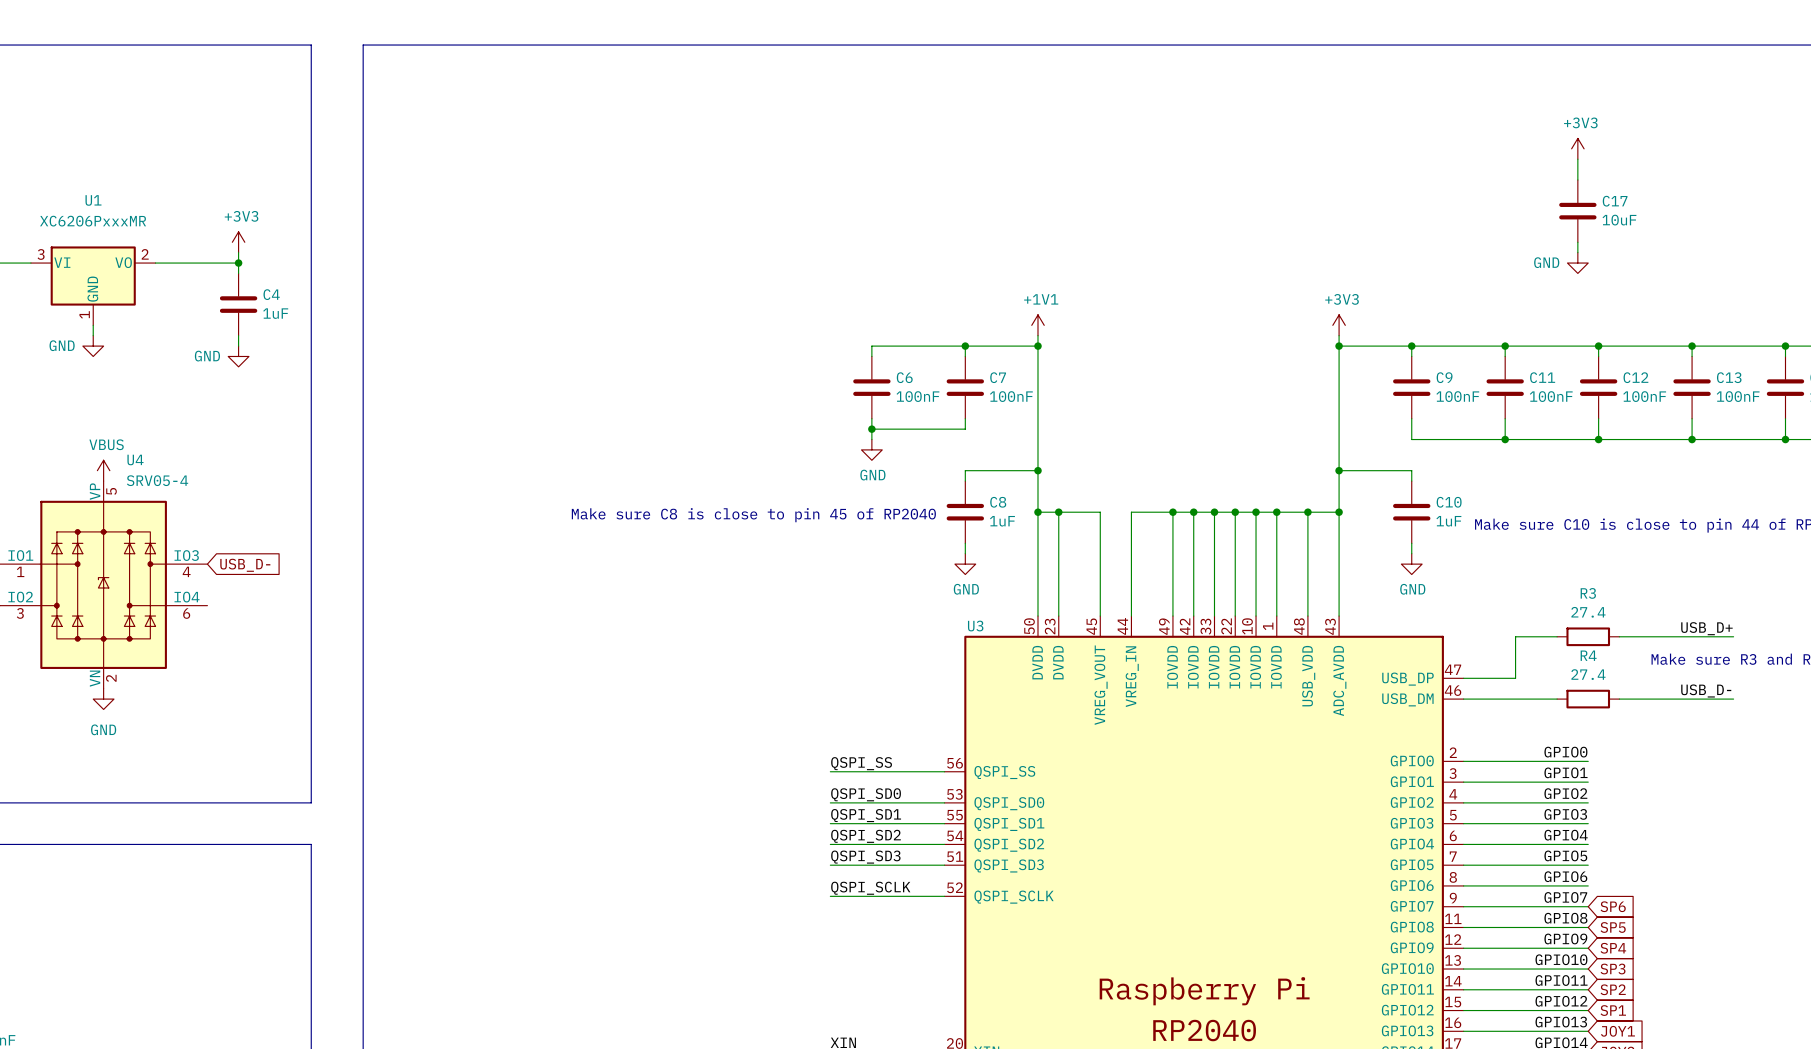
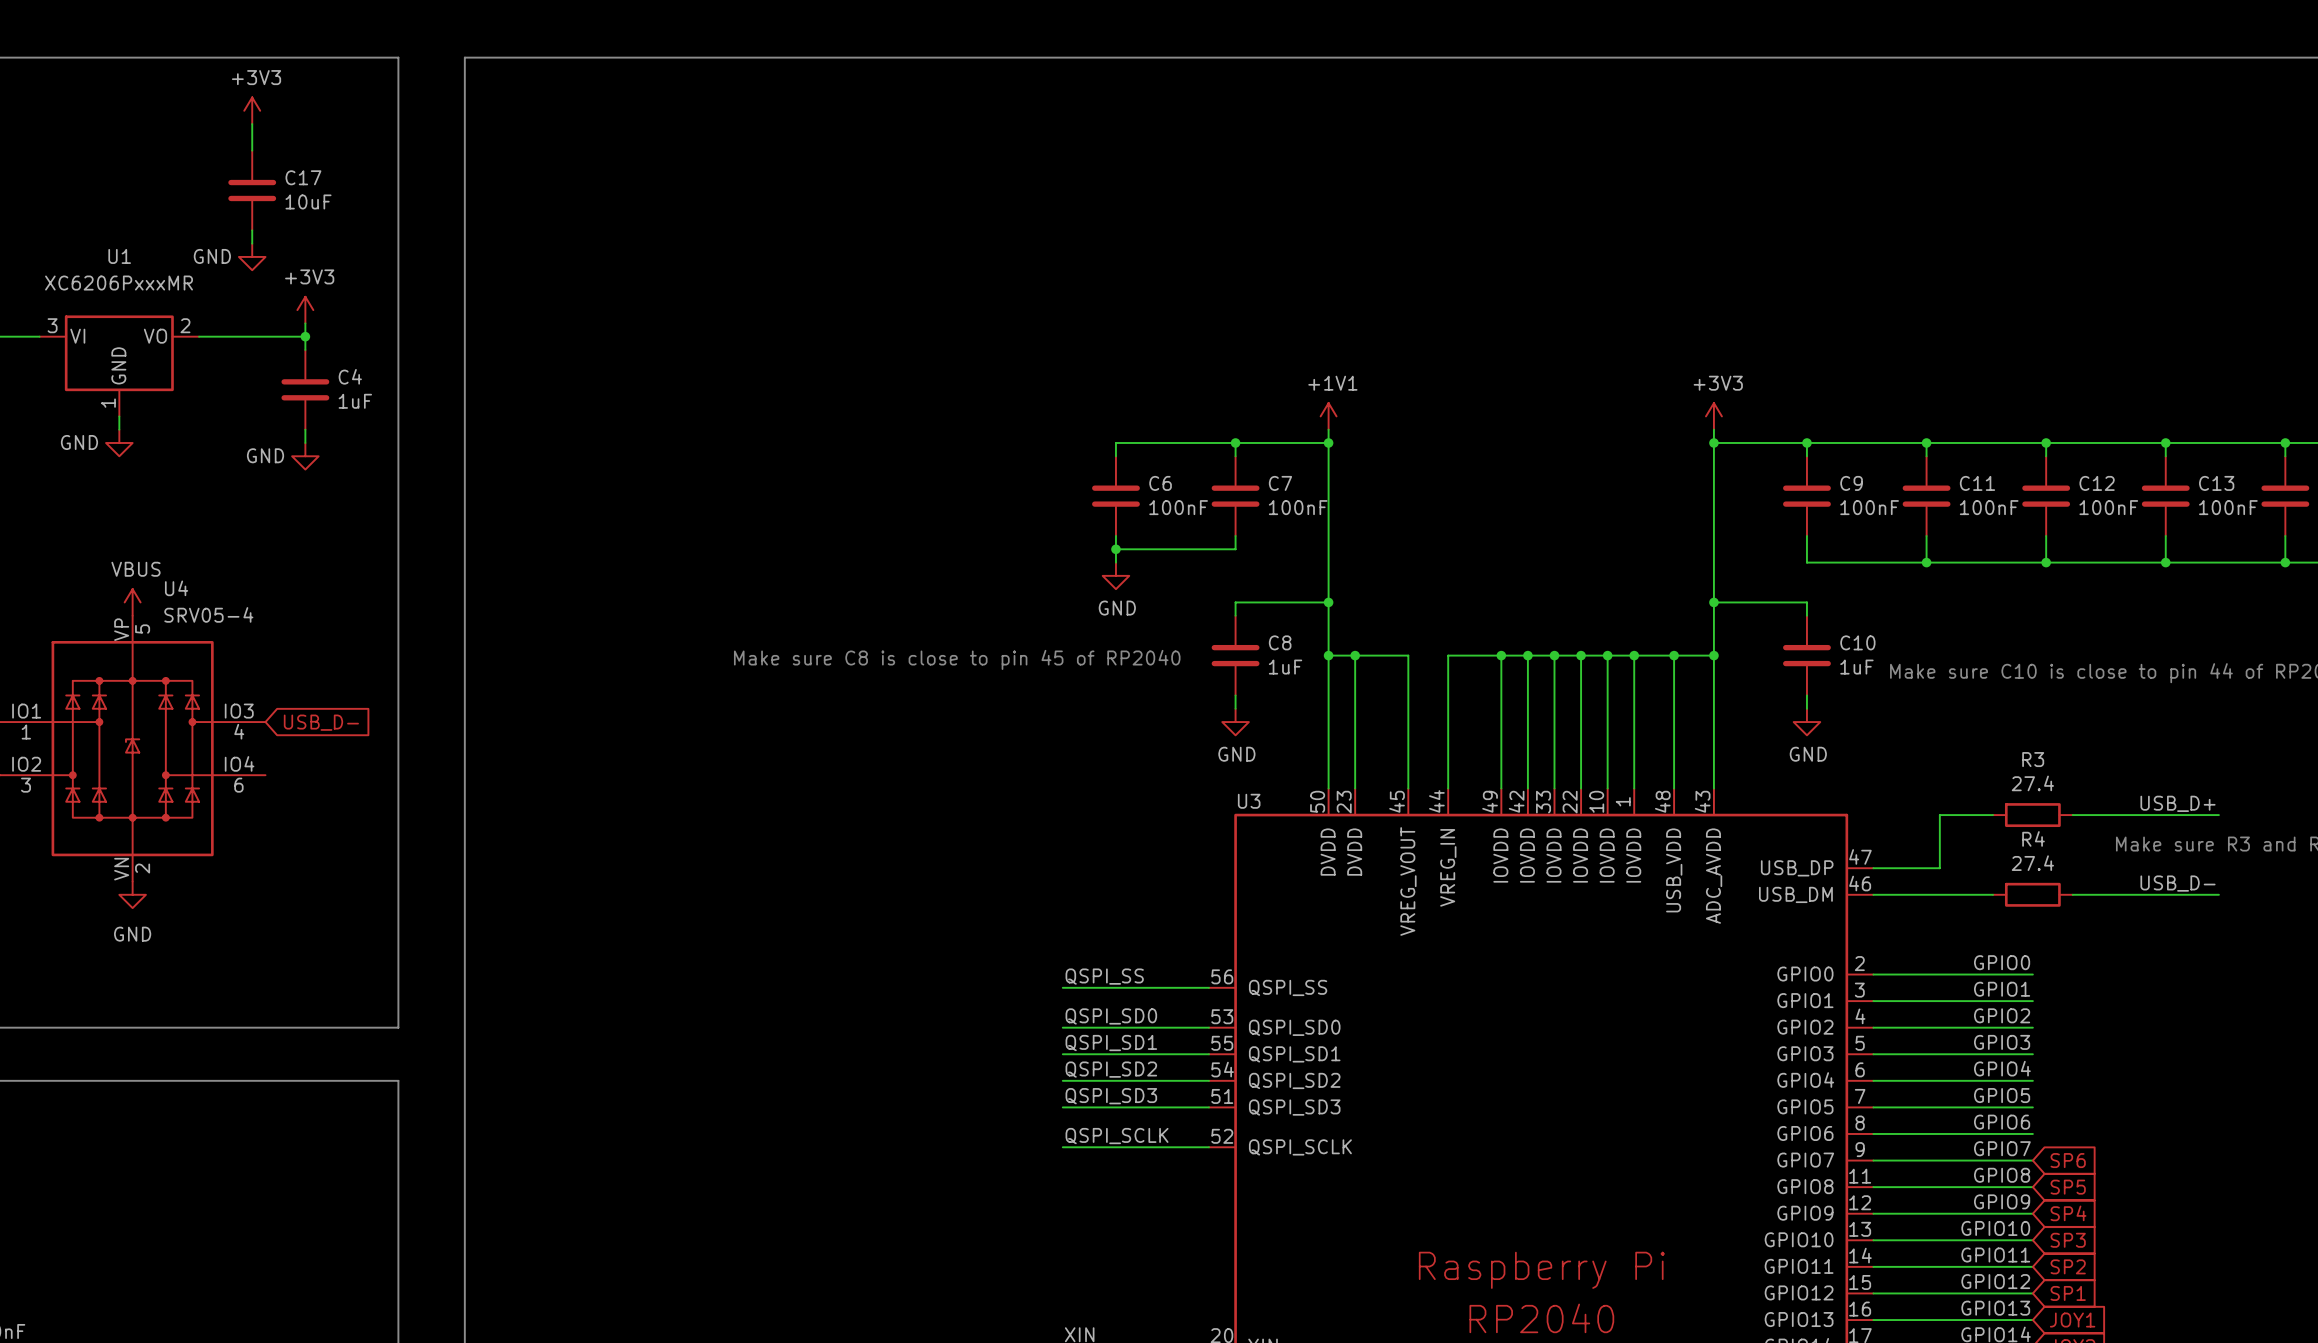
power symbol: none -> +3V3 (252, 110)
wire: none -> (252, 124) (252, 150)
power symbol: +3V3 (1577, 148) -> none
wire: (1577, 159) (1577, 179) -> none
wire: none -> (252, 230) (252, 243)
power symbol: none -> GND (252, 256)
C17 position: (1577, 211) -> (252, 190)
wire: (1577, 242) (1577, 252) -> none
power symbol: GND (1577, 263) -> none

